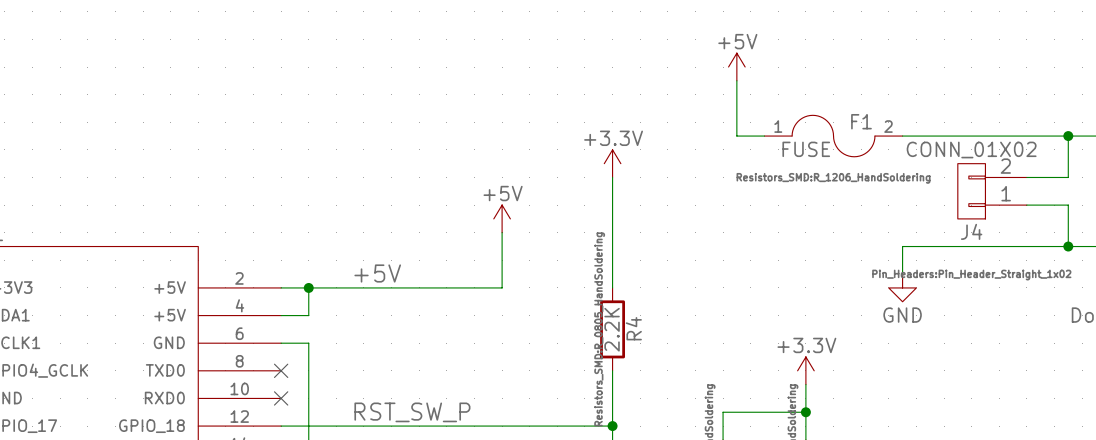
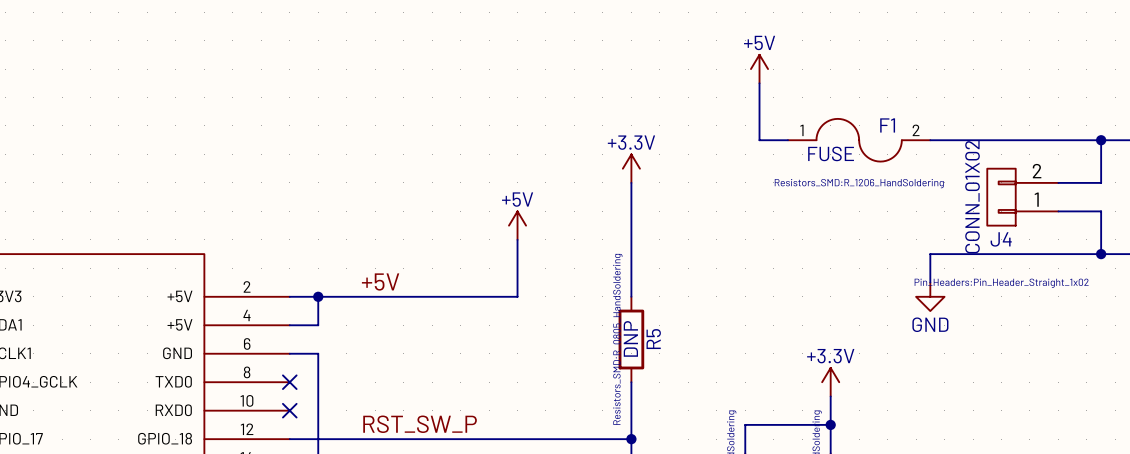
J4 value rotation: 0° (971, 150) -> 90° counterclockwise (972, 197)
R4 name: R4 (633, 328) -> R5 (653, 339)
R4 value: 2.2K (612, 329) -> DNP (630, 338)

